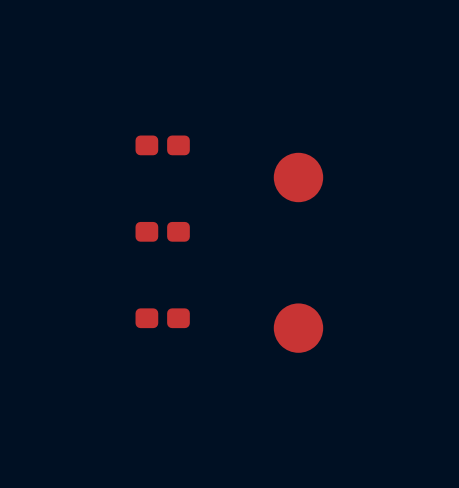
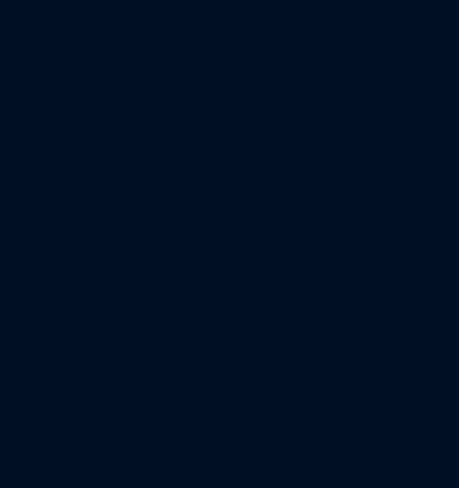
part: (162, 145) -> none
part: (298, 177) -> none
part: (162, 231) -> none
part: (162, 318) -> none
part: (298, 328) -> none

